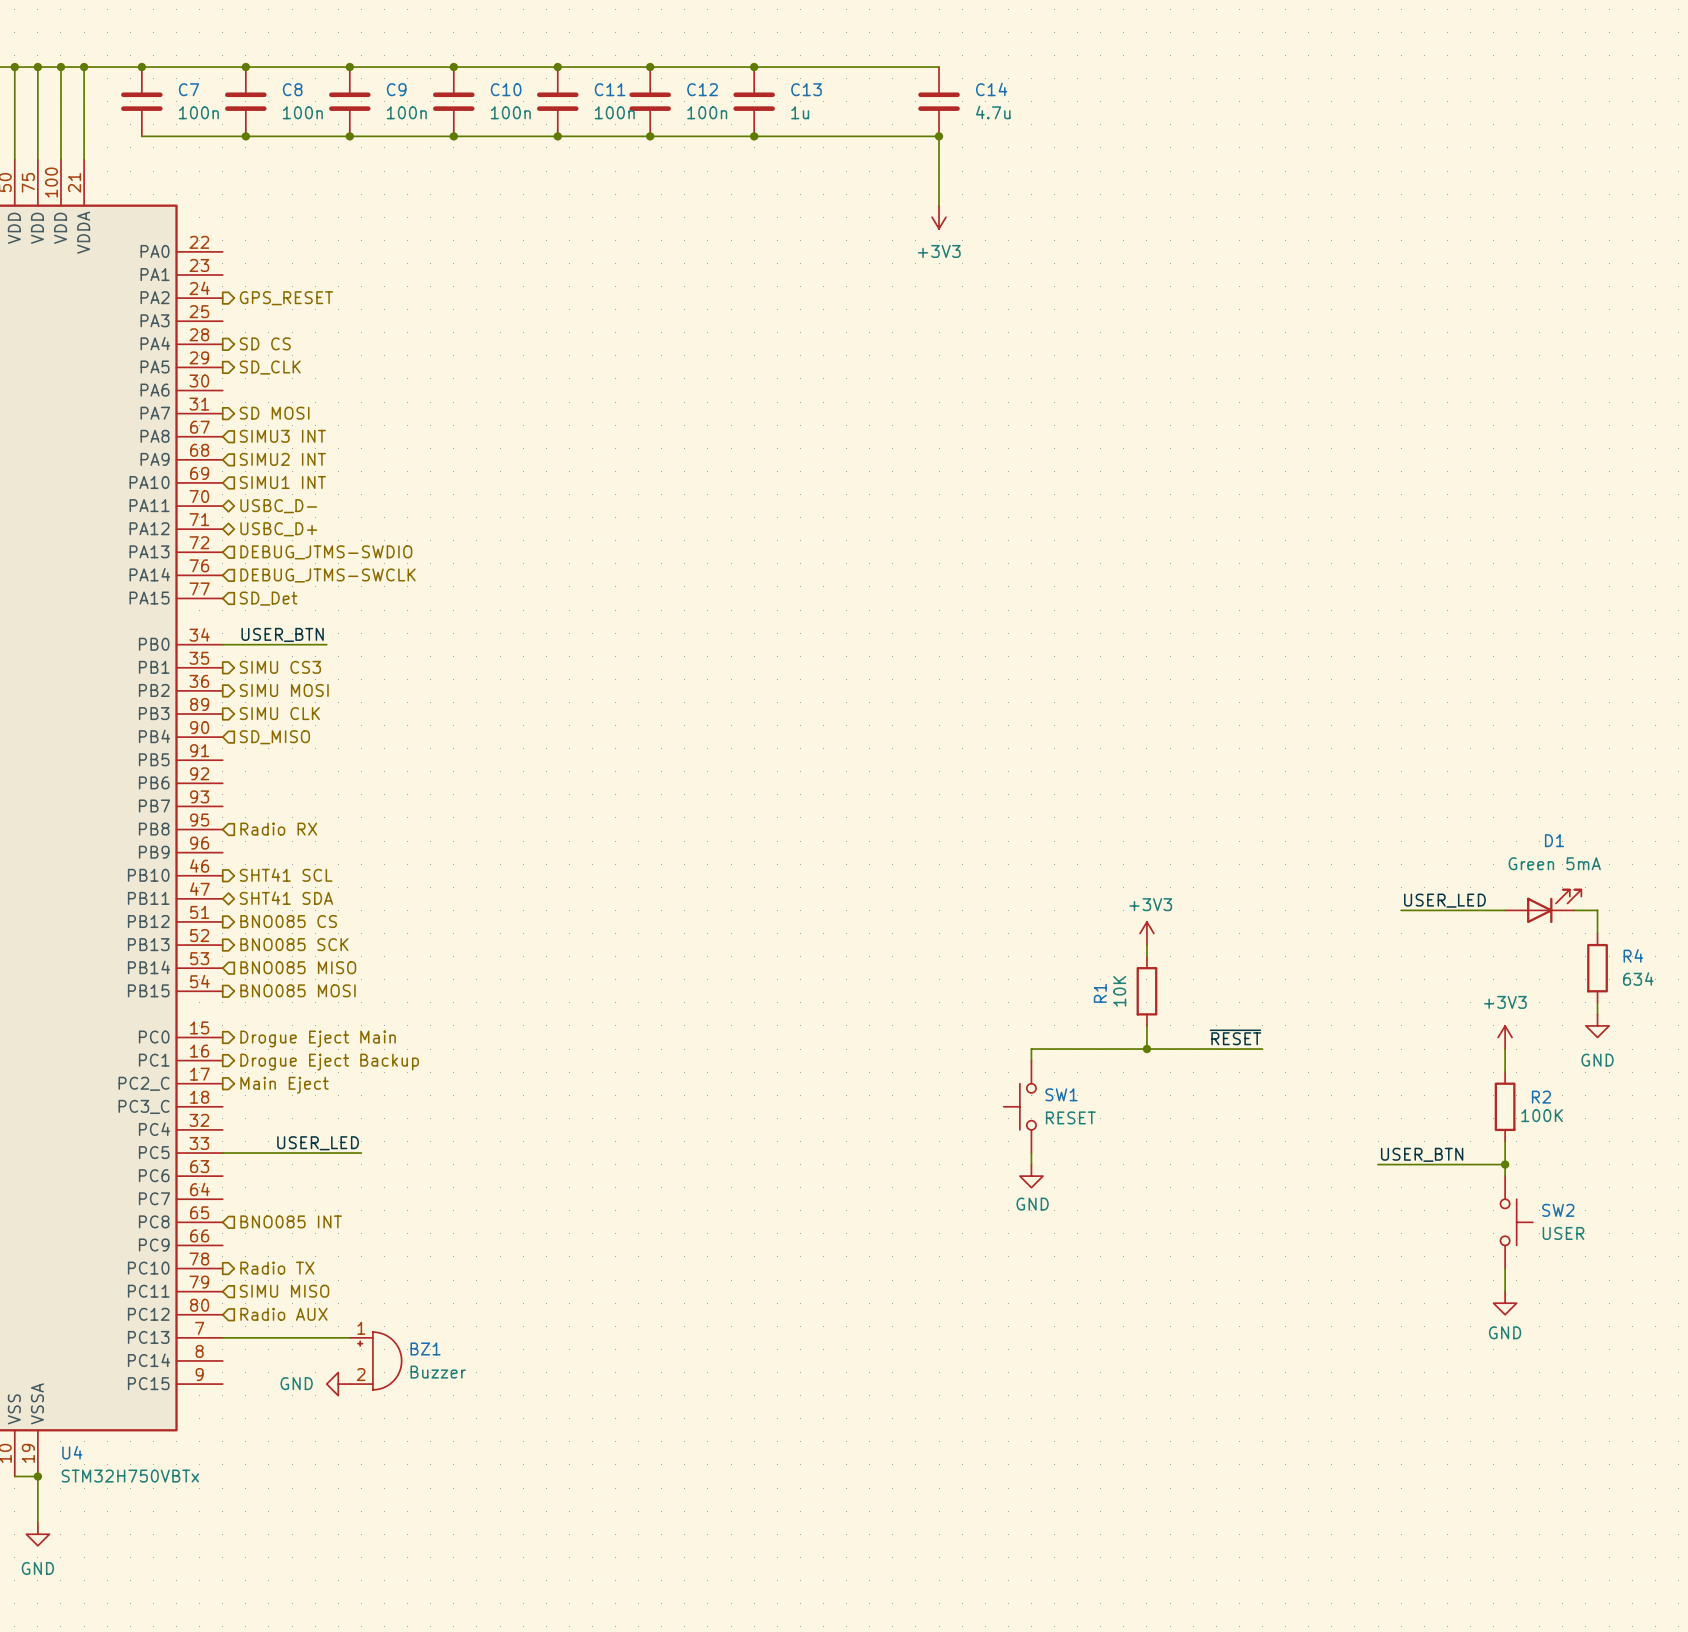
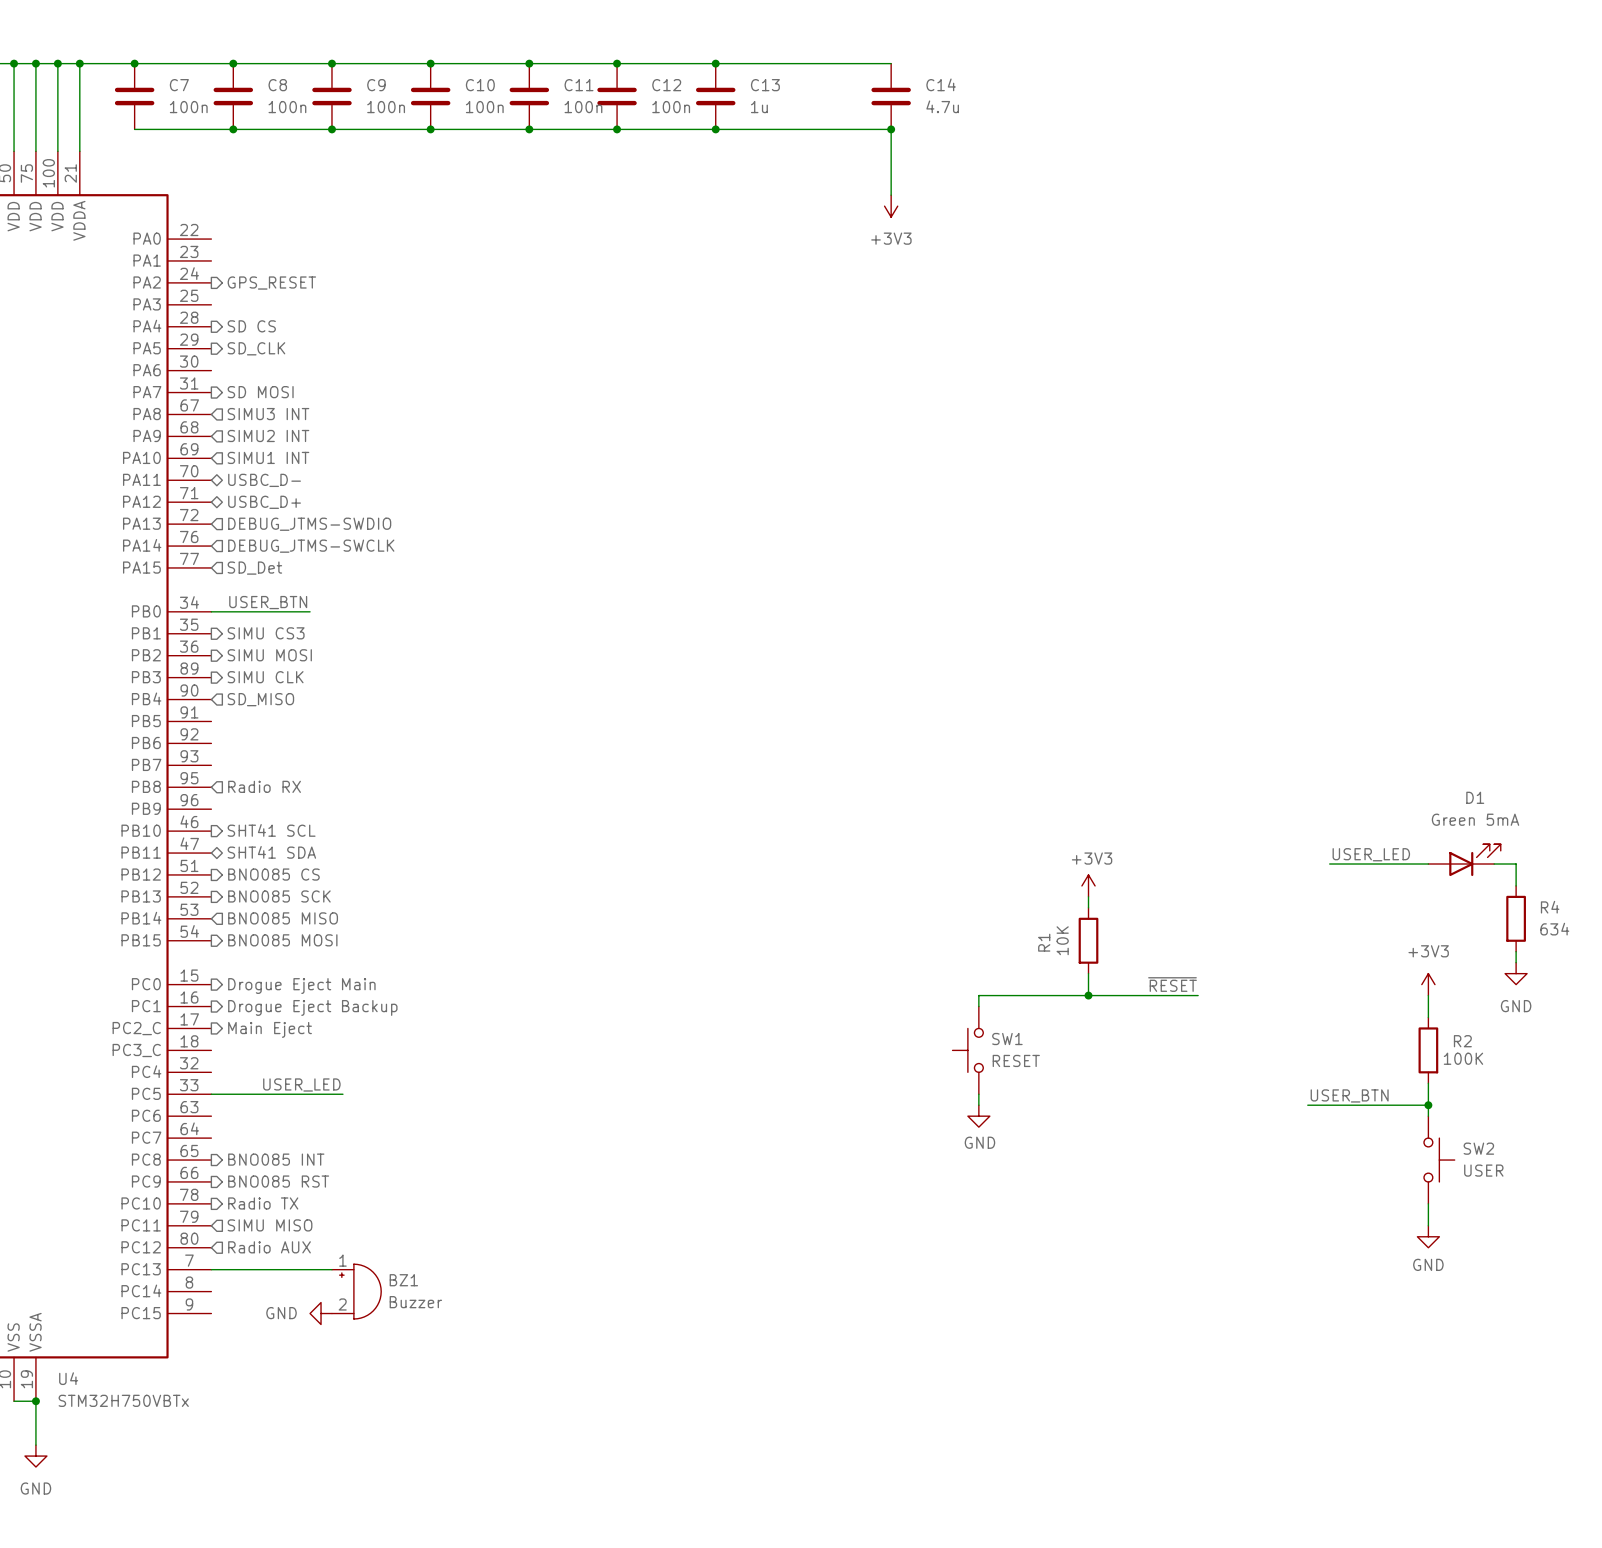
hierarchical label shape: input (291, 1221) -> output (276, 1159)
hierarchical label: none -> BNO085 RST (278, 1181)

